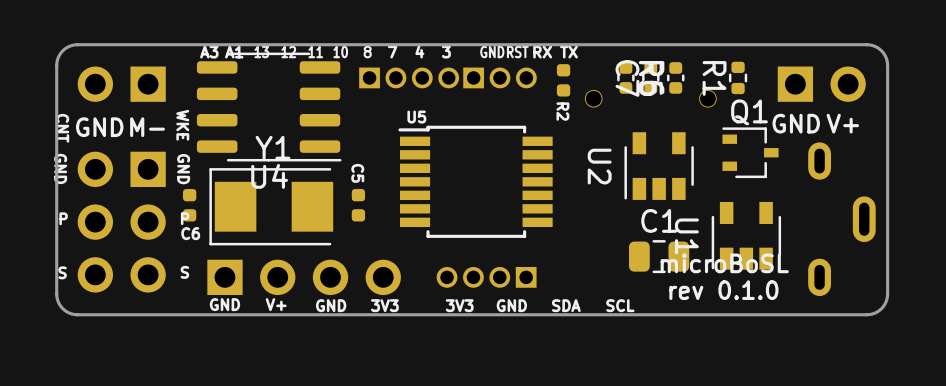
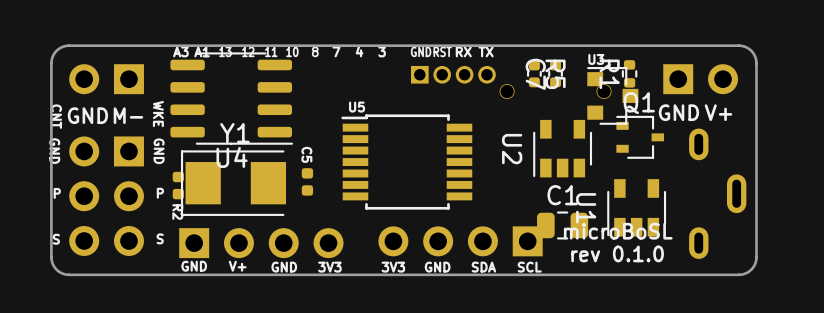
part: (409, 77) -> none
part: (500, 77) -> none
part: (675, 77) -> none
part: none -> (453, 74)
R2 position: (563, 80) -> (178, 185)
U3: none -> (612, 95)
C6: (189, 205) -> none
part: none -> (460, 241)
part: (486, 277) -> none

